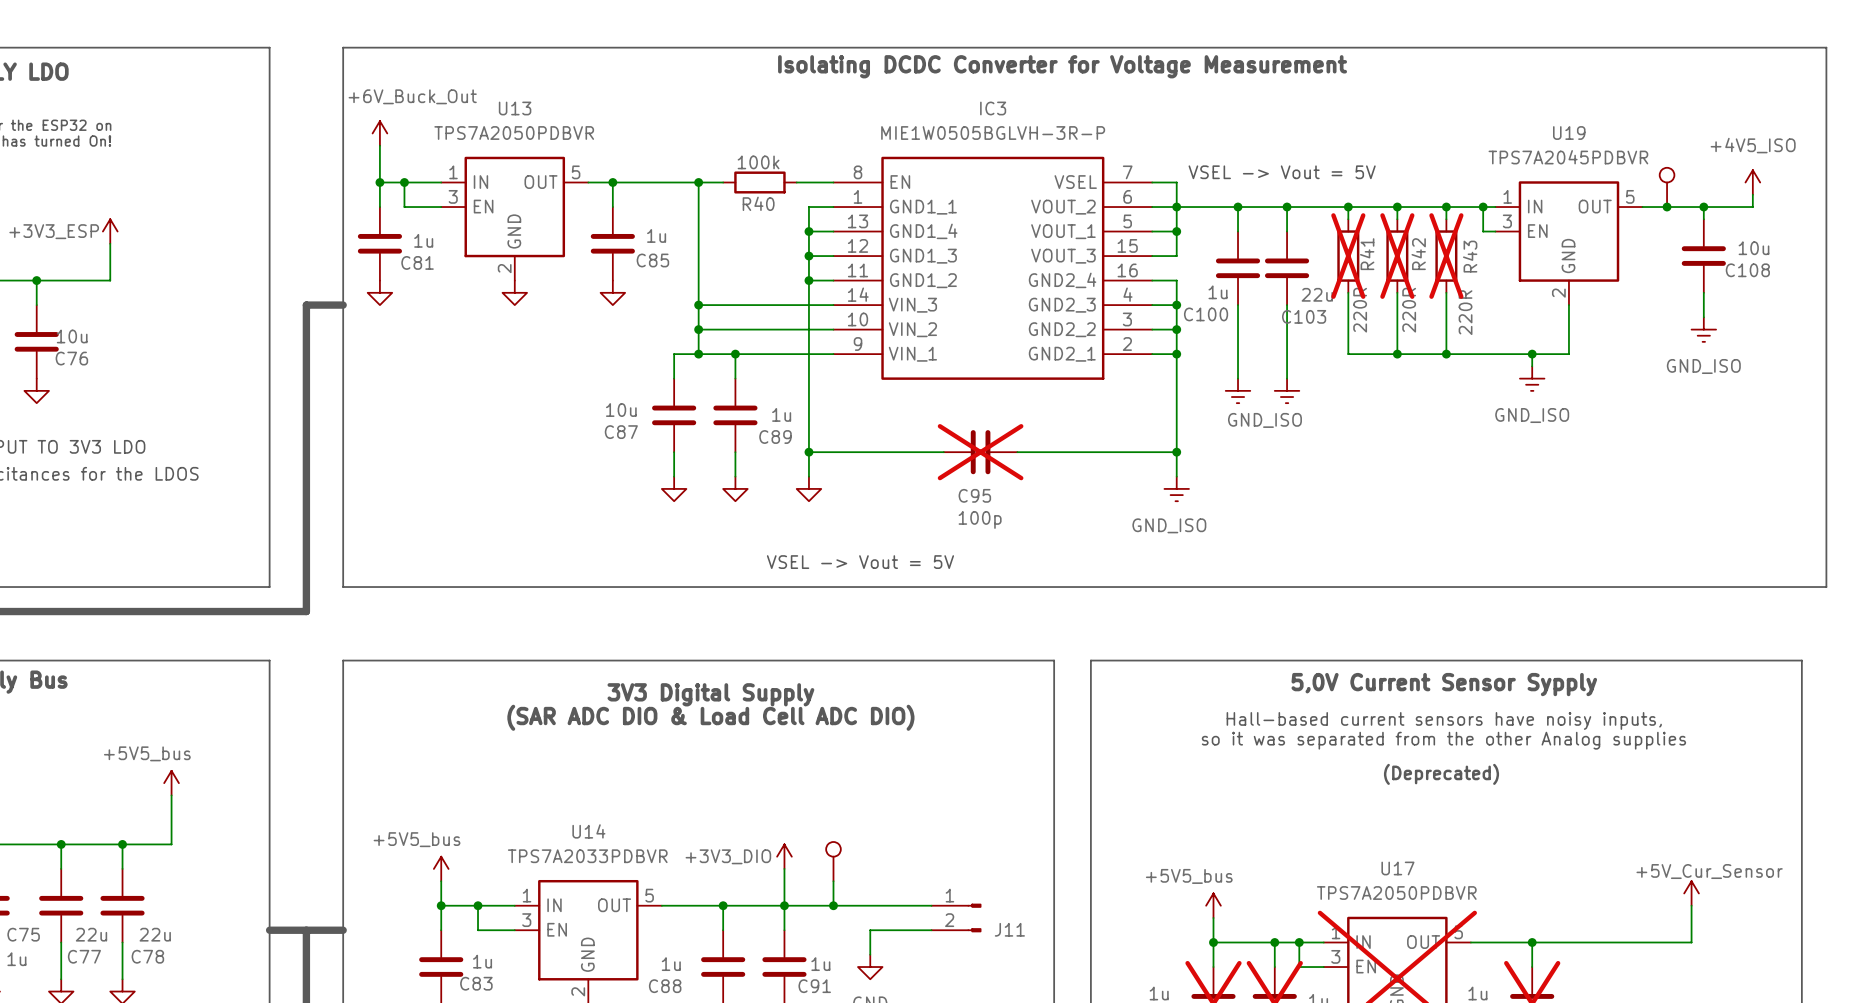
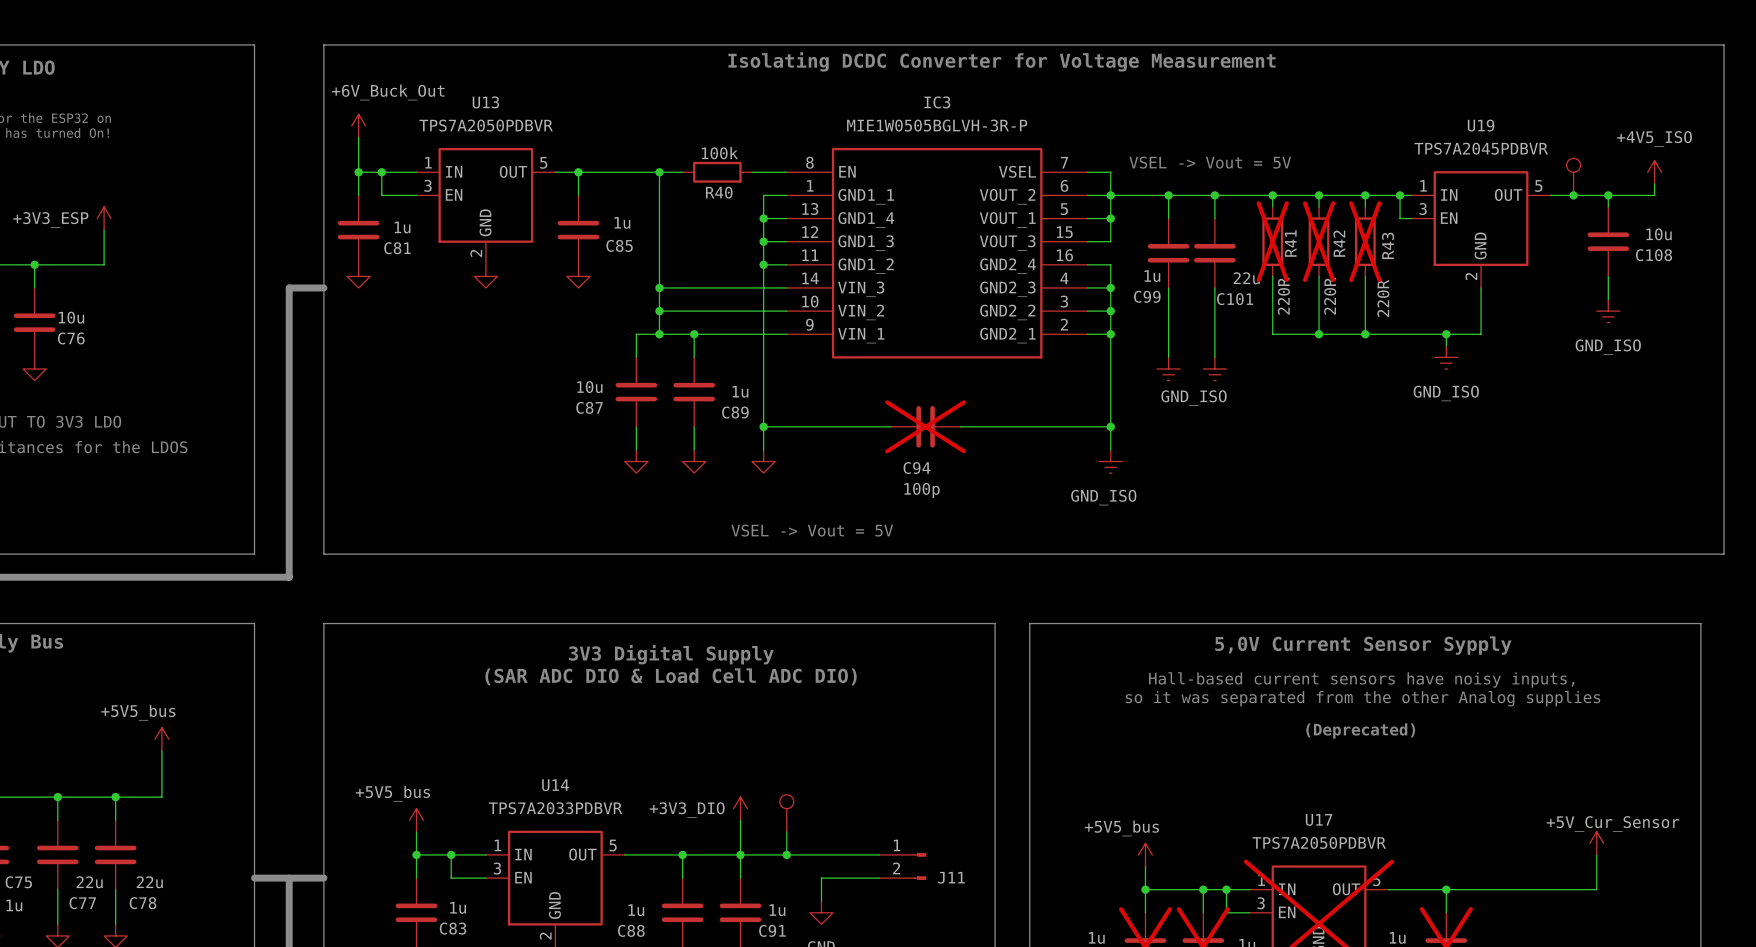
C100 name: C100 (1206, 314) -> C99 (1147, 296)
C103 name: C103 (1304, 316) -> C101 (1235, 299)
C95 name: C95 (974, 495) -> C94 (916, 468)

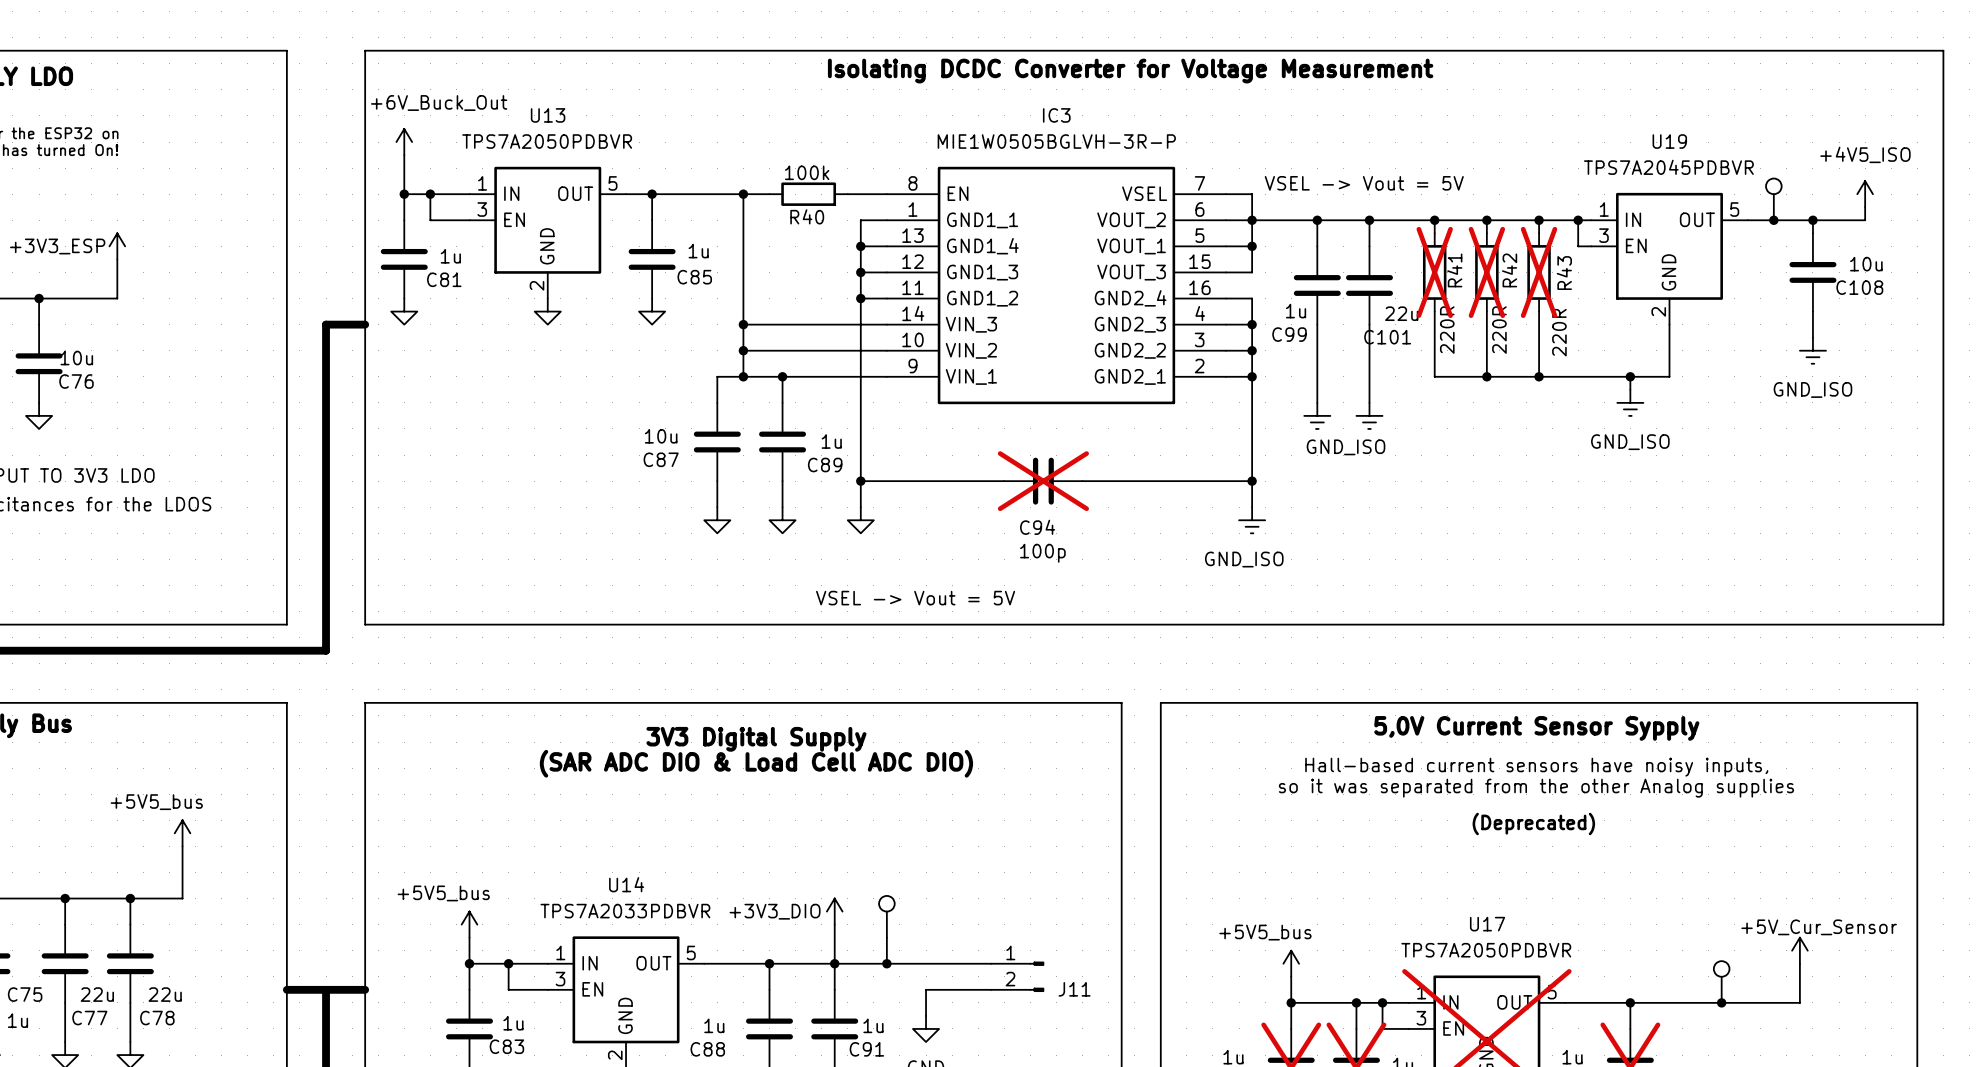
part: none -> (1721, 982)
junction: none -> (1721, 1002)

